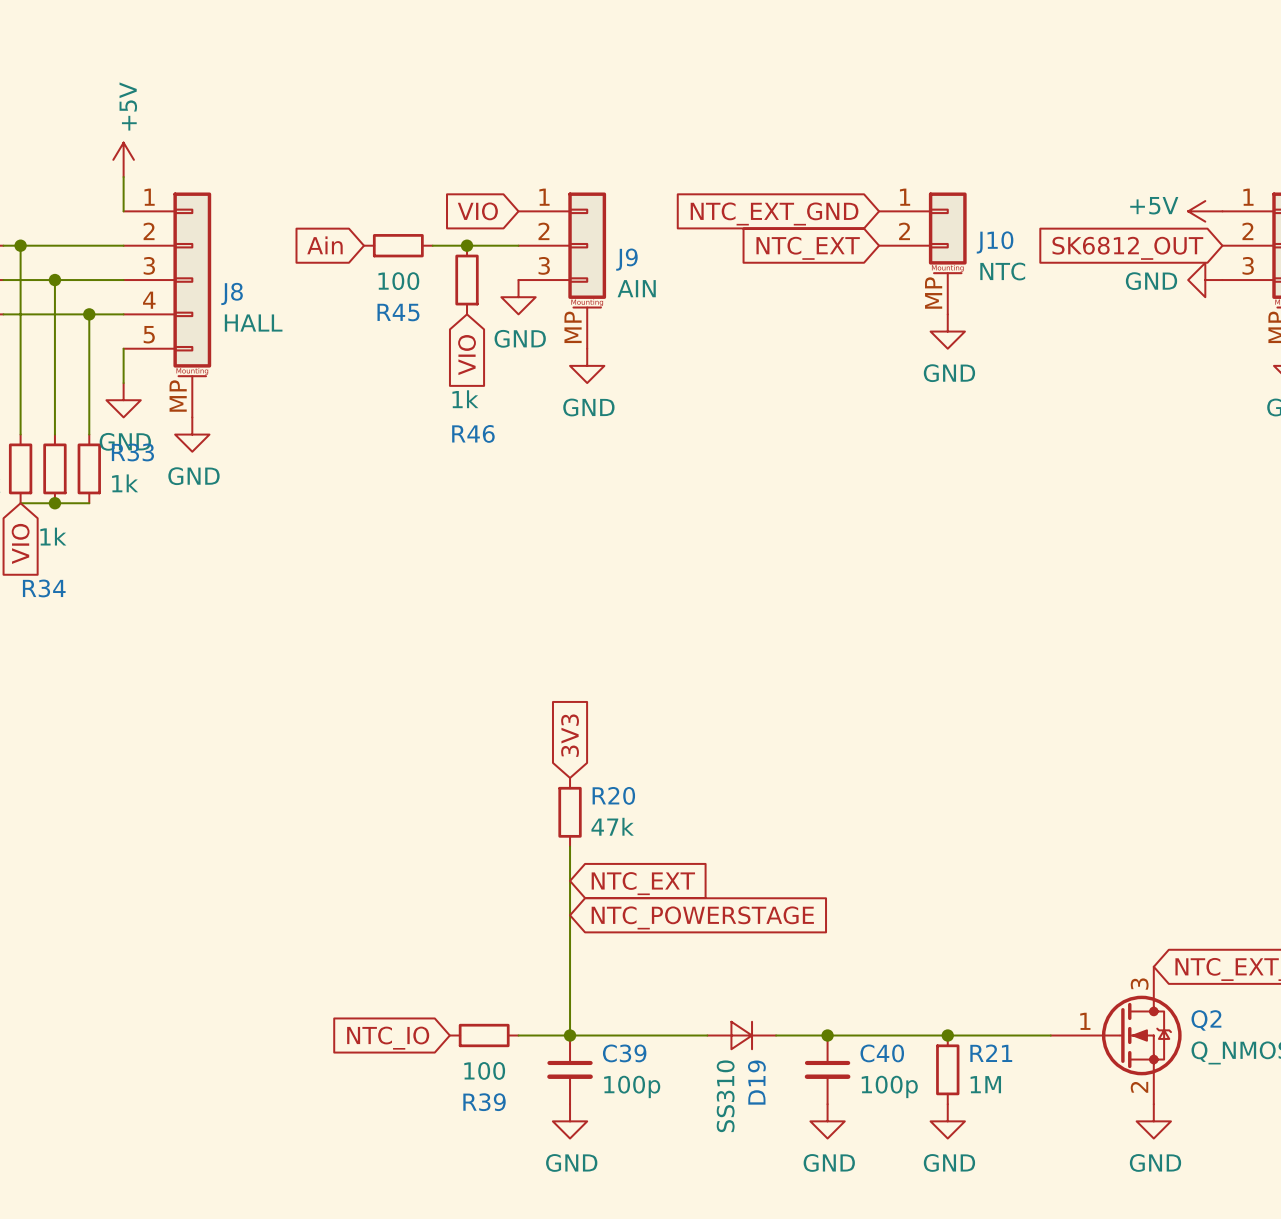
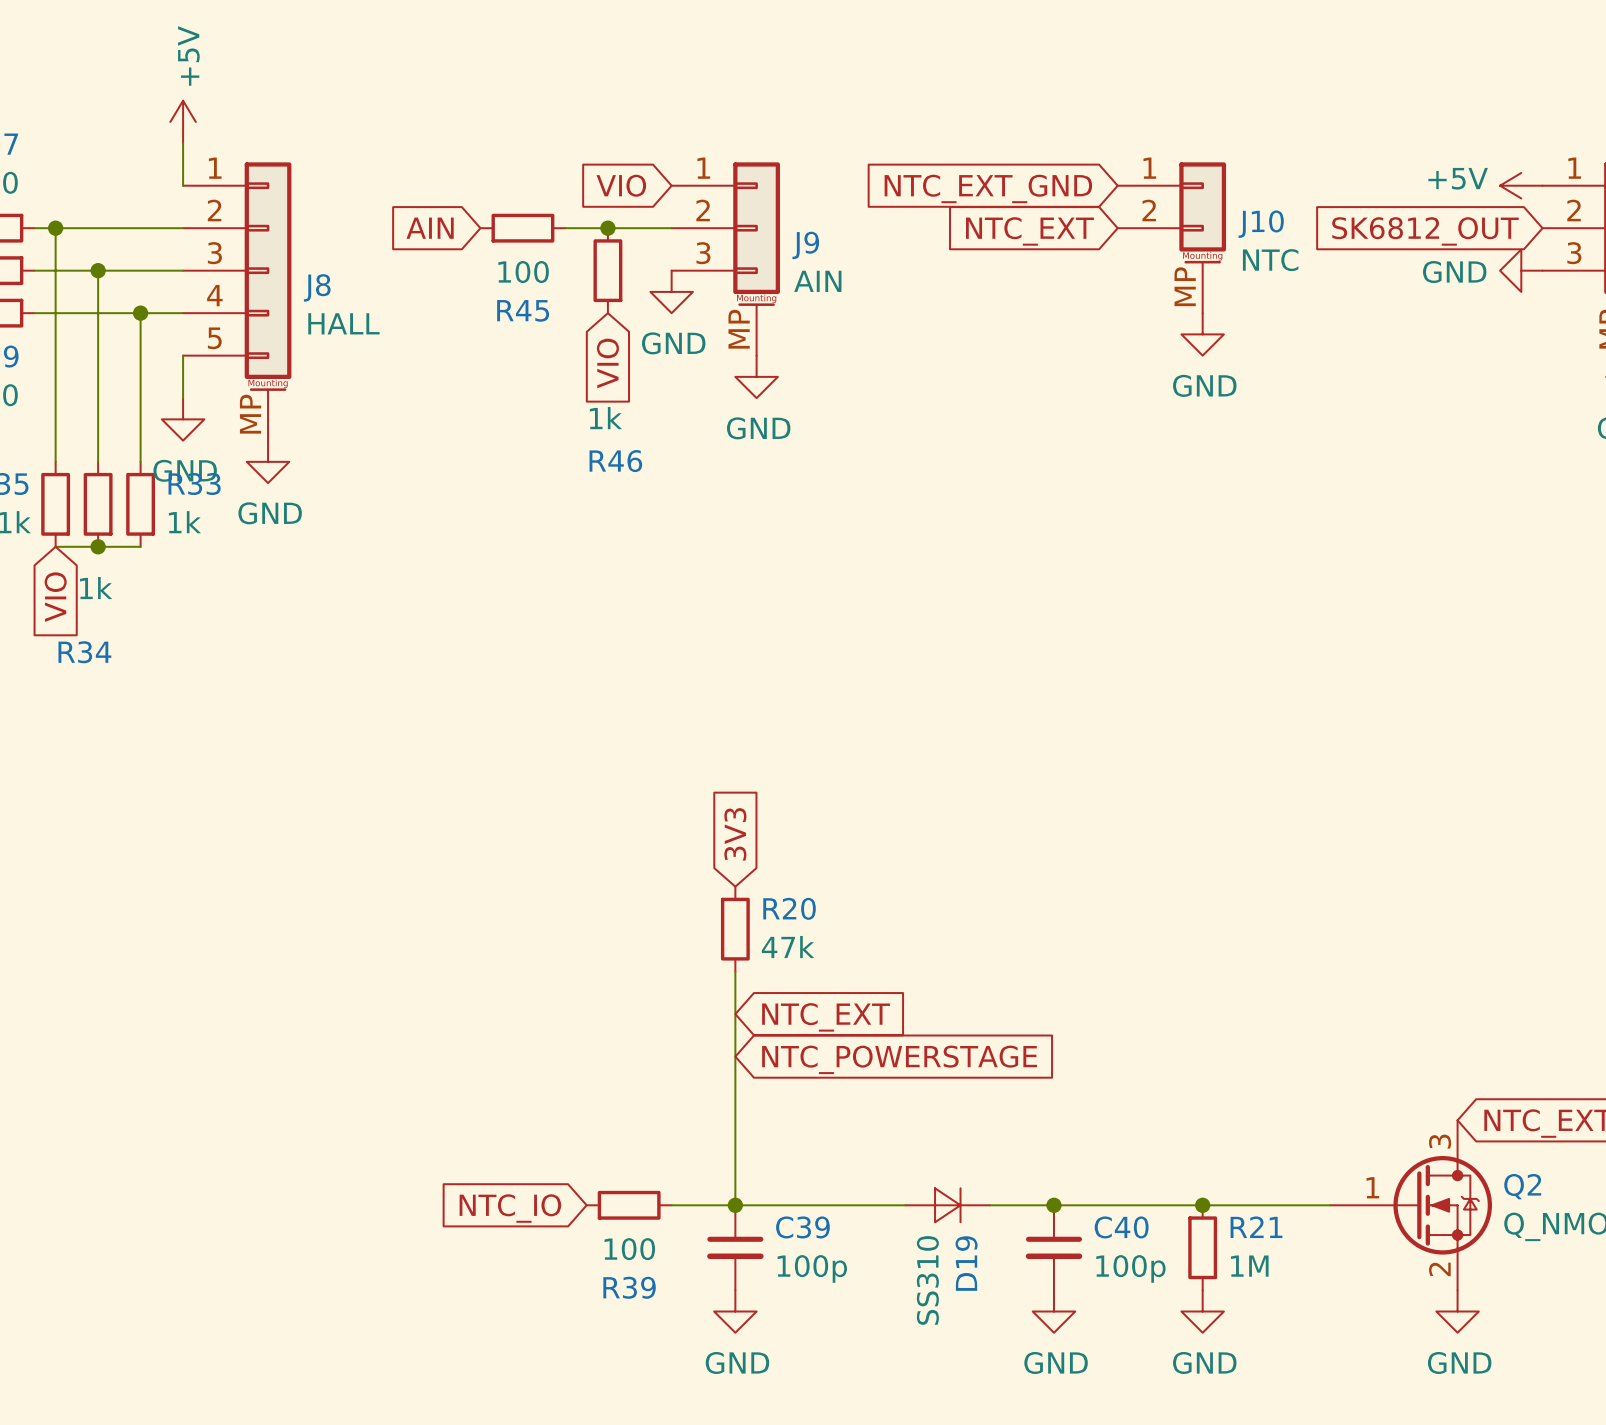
global label: Ain (324, 245) -> AIN (430, 228)

